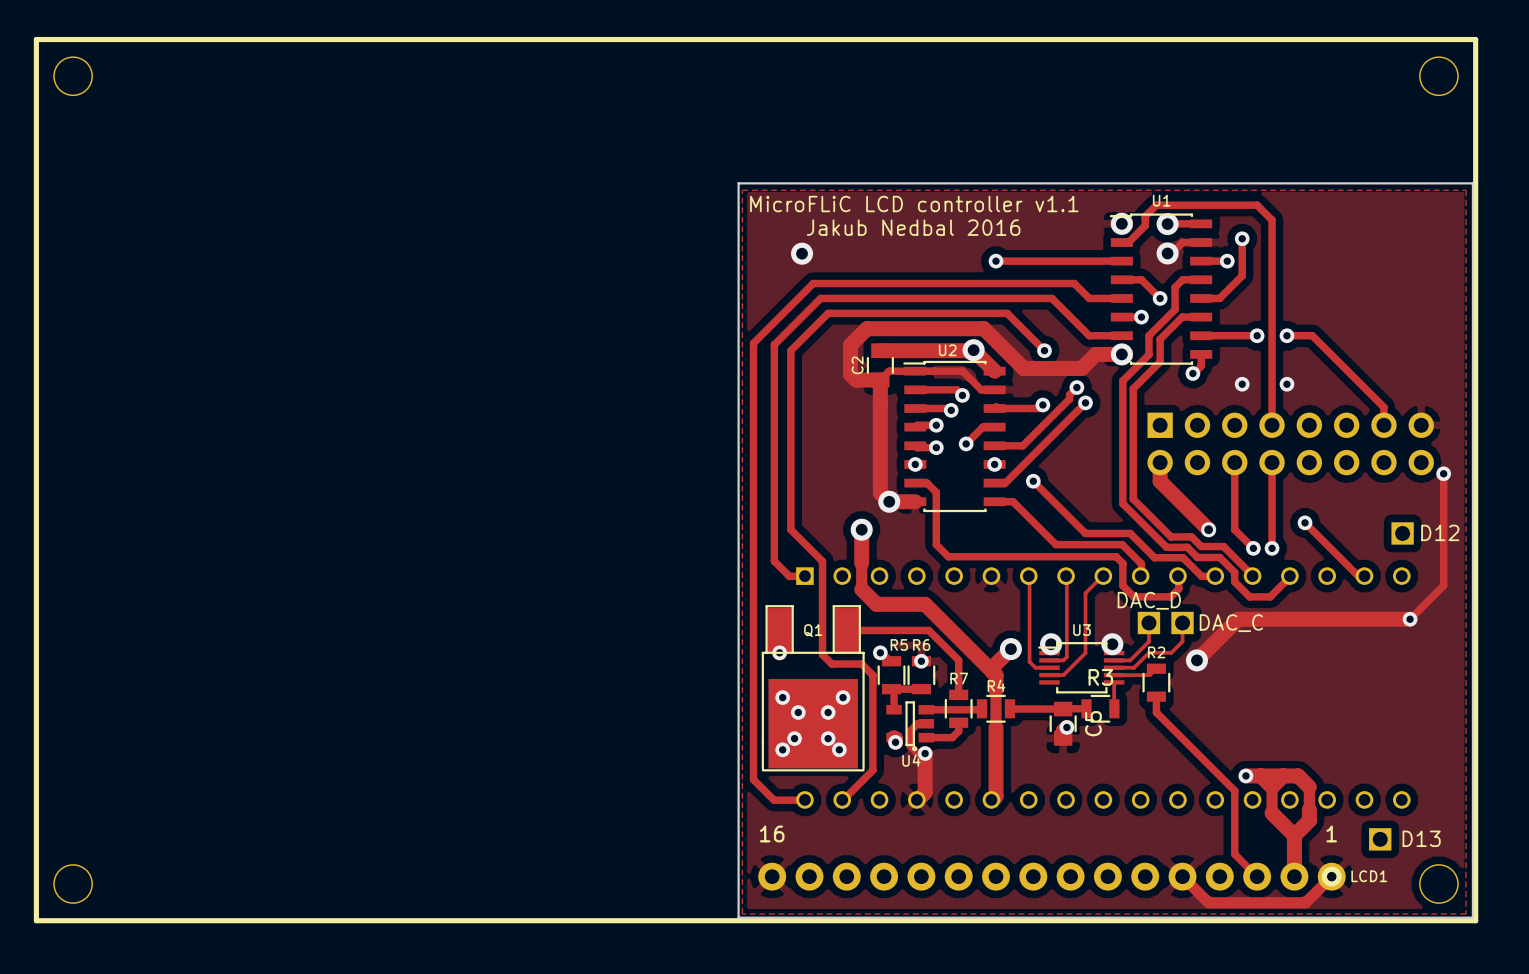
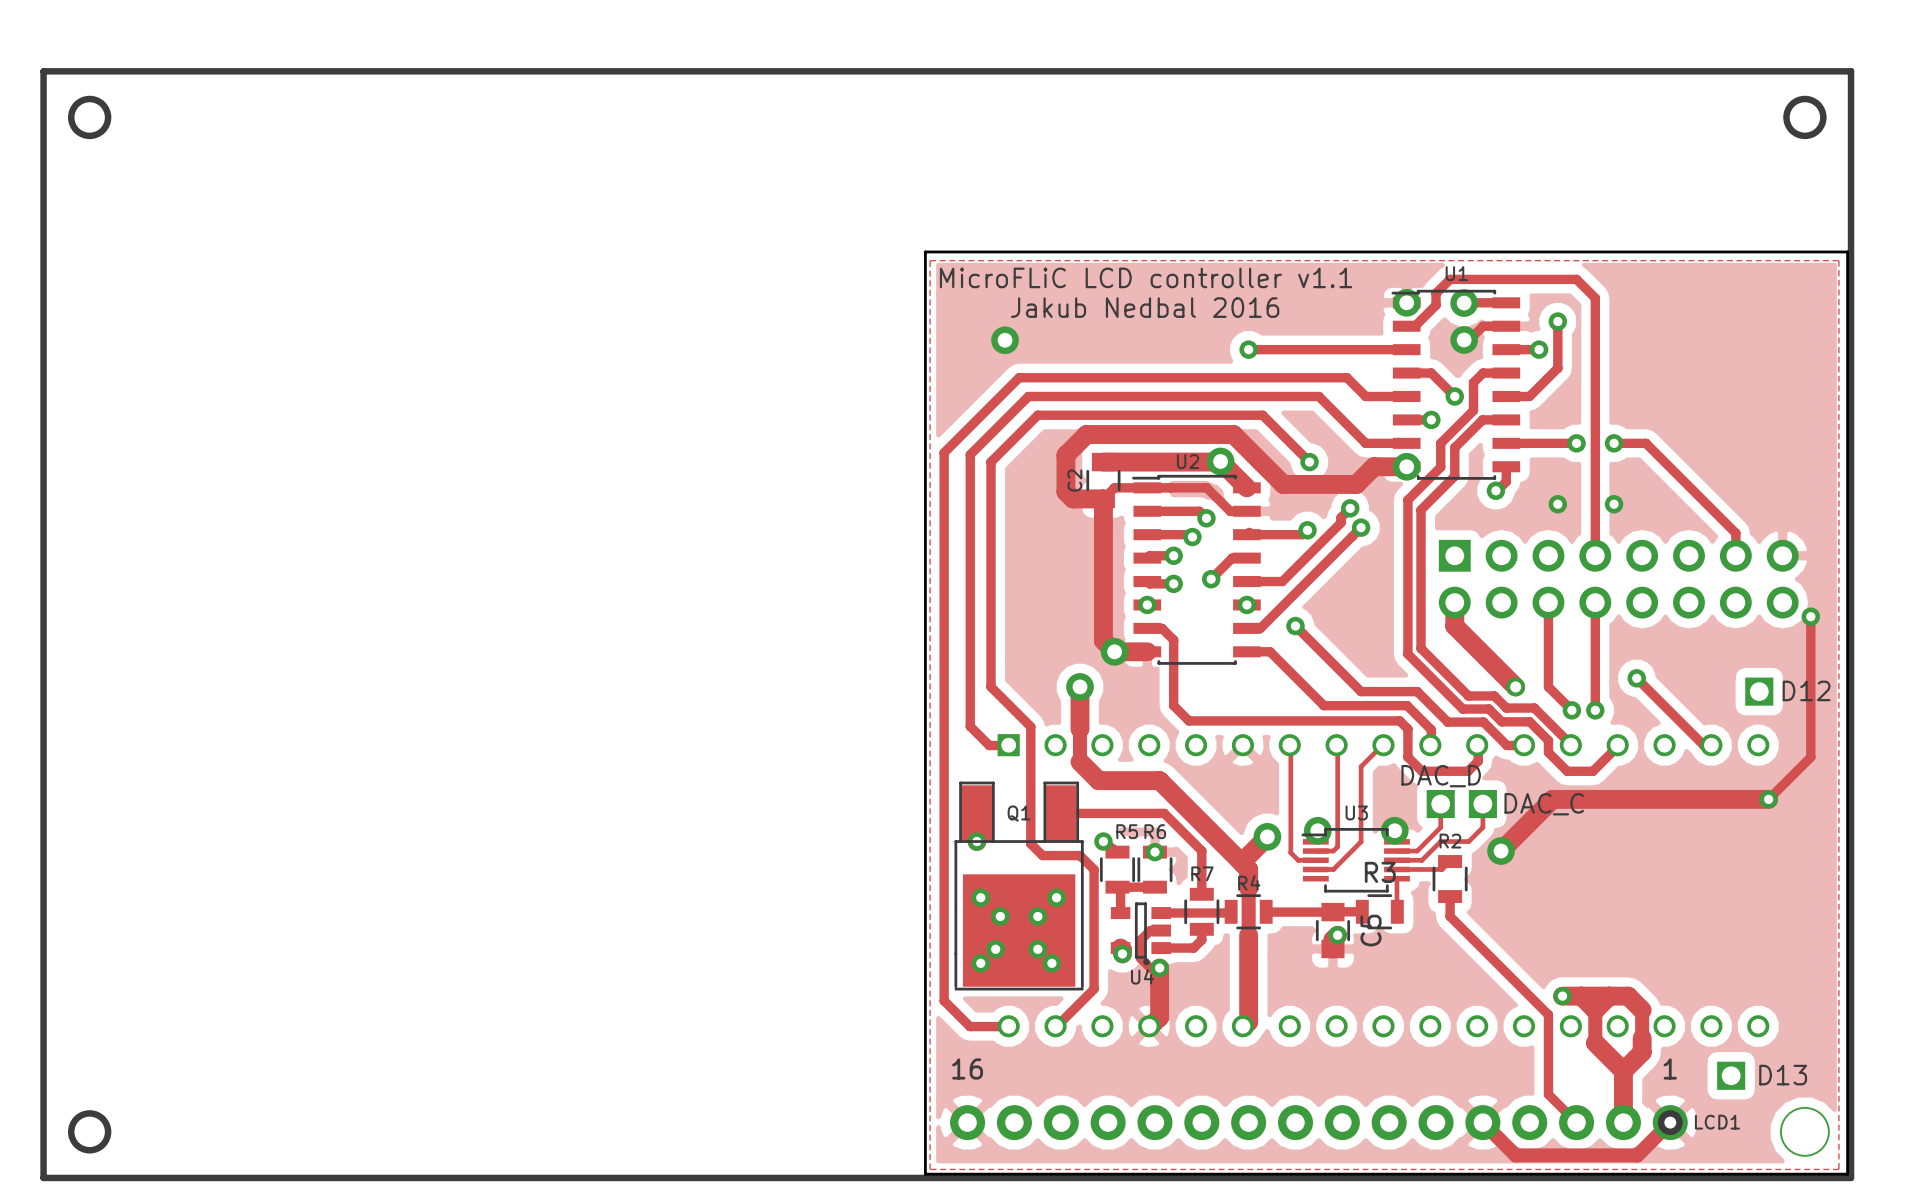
LCD1 footprint: [33, 36, 1479, 924] -> [40, 68, 1855, 1182]

